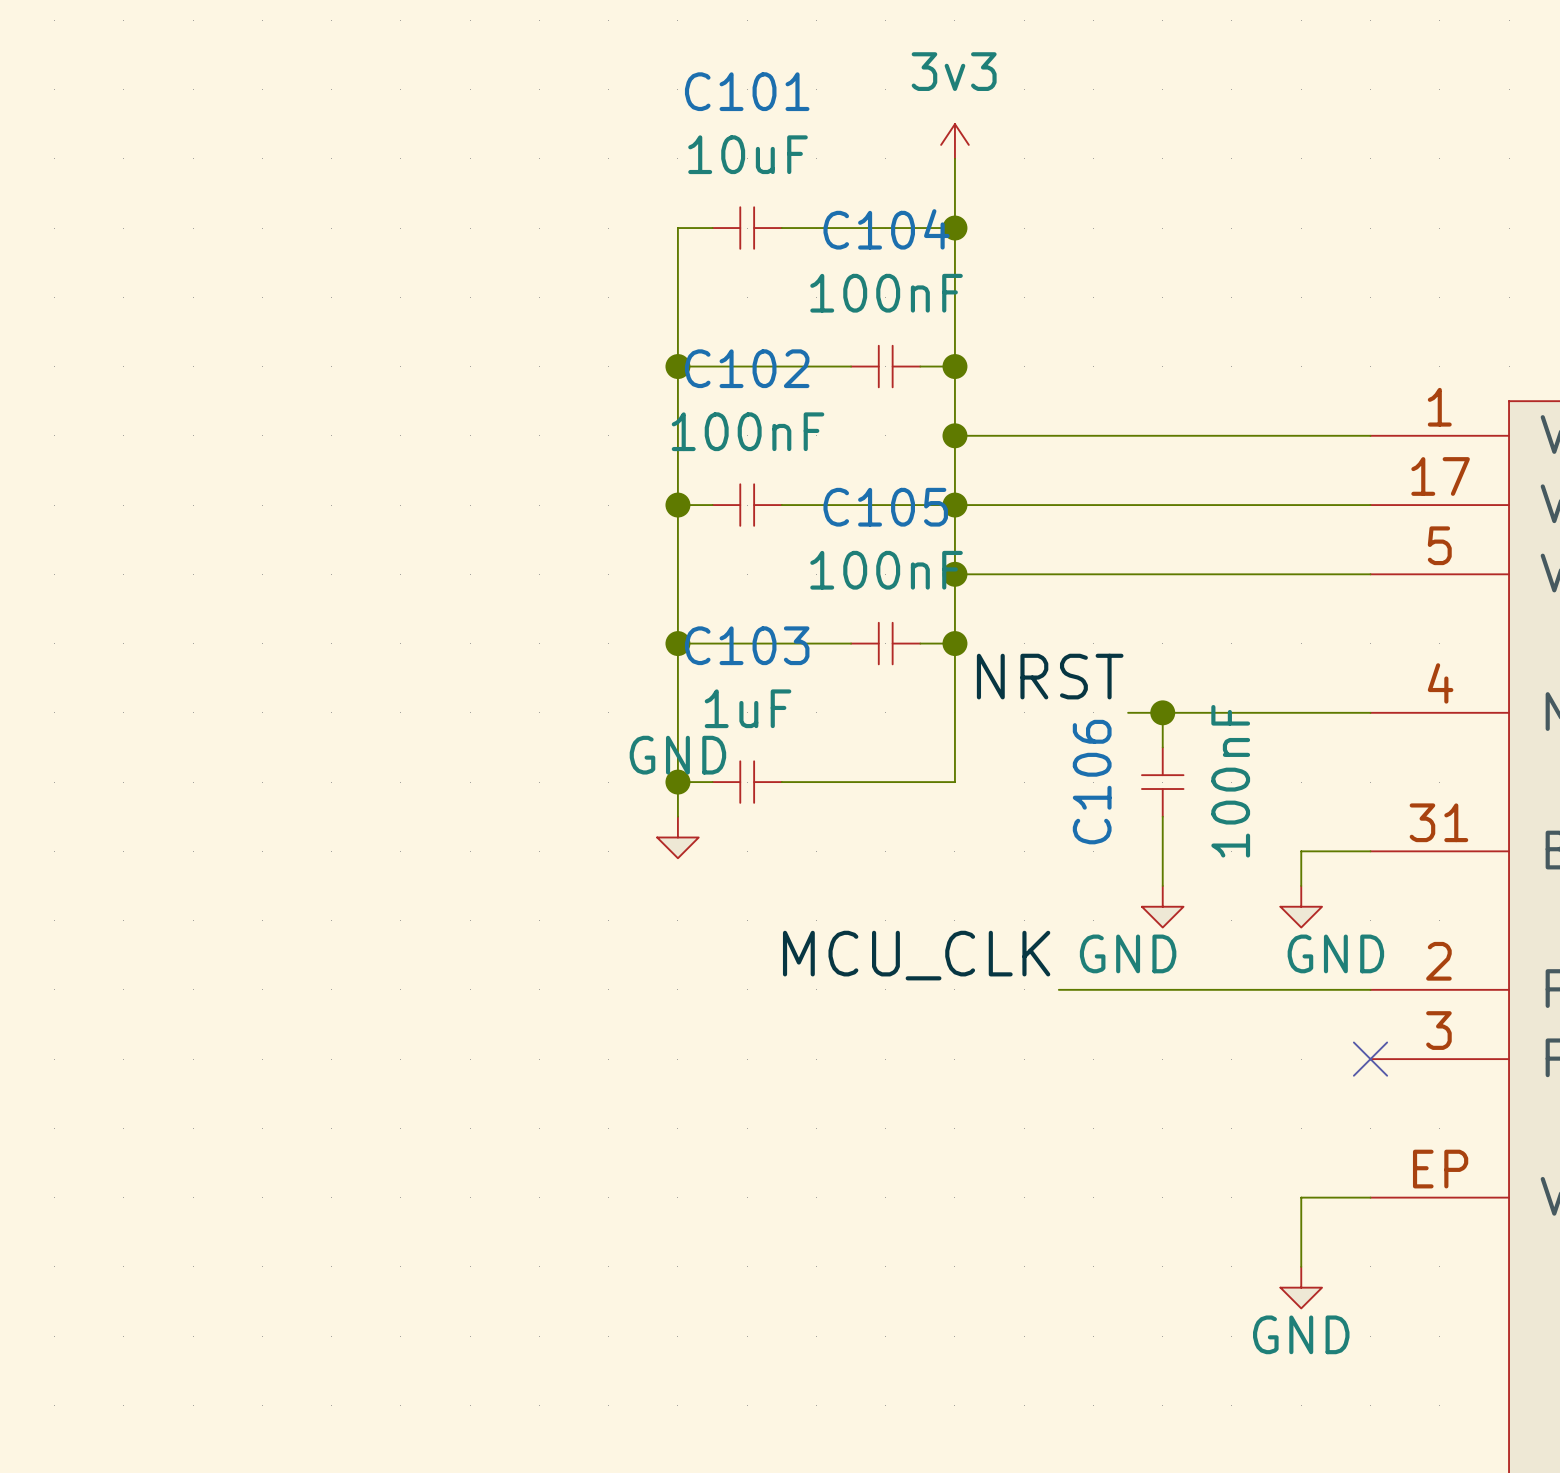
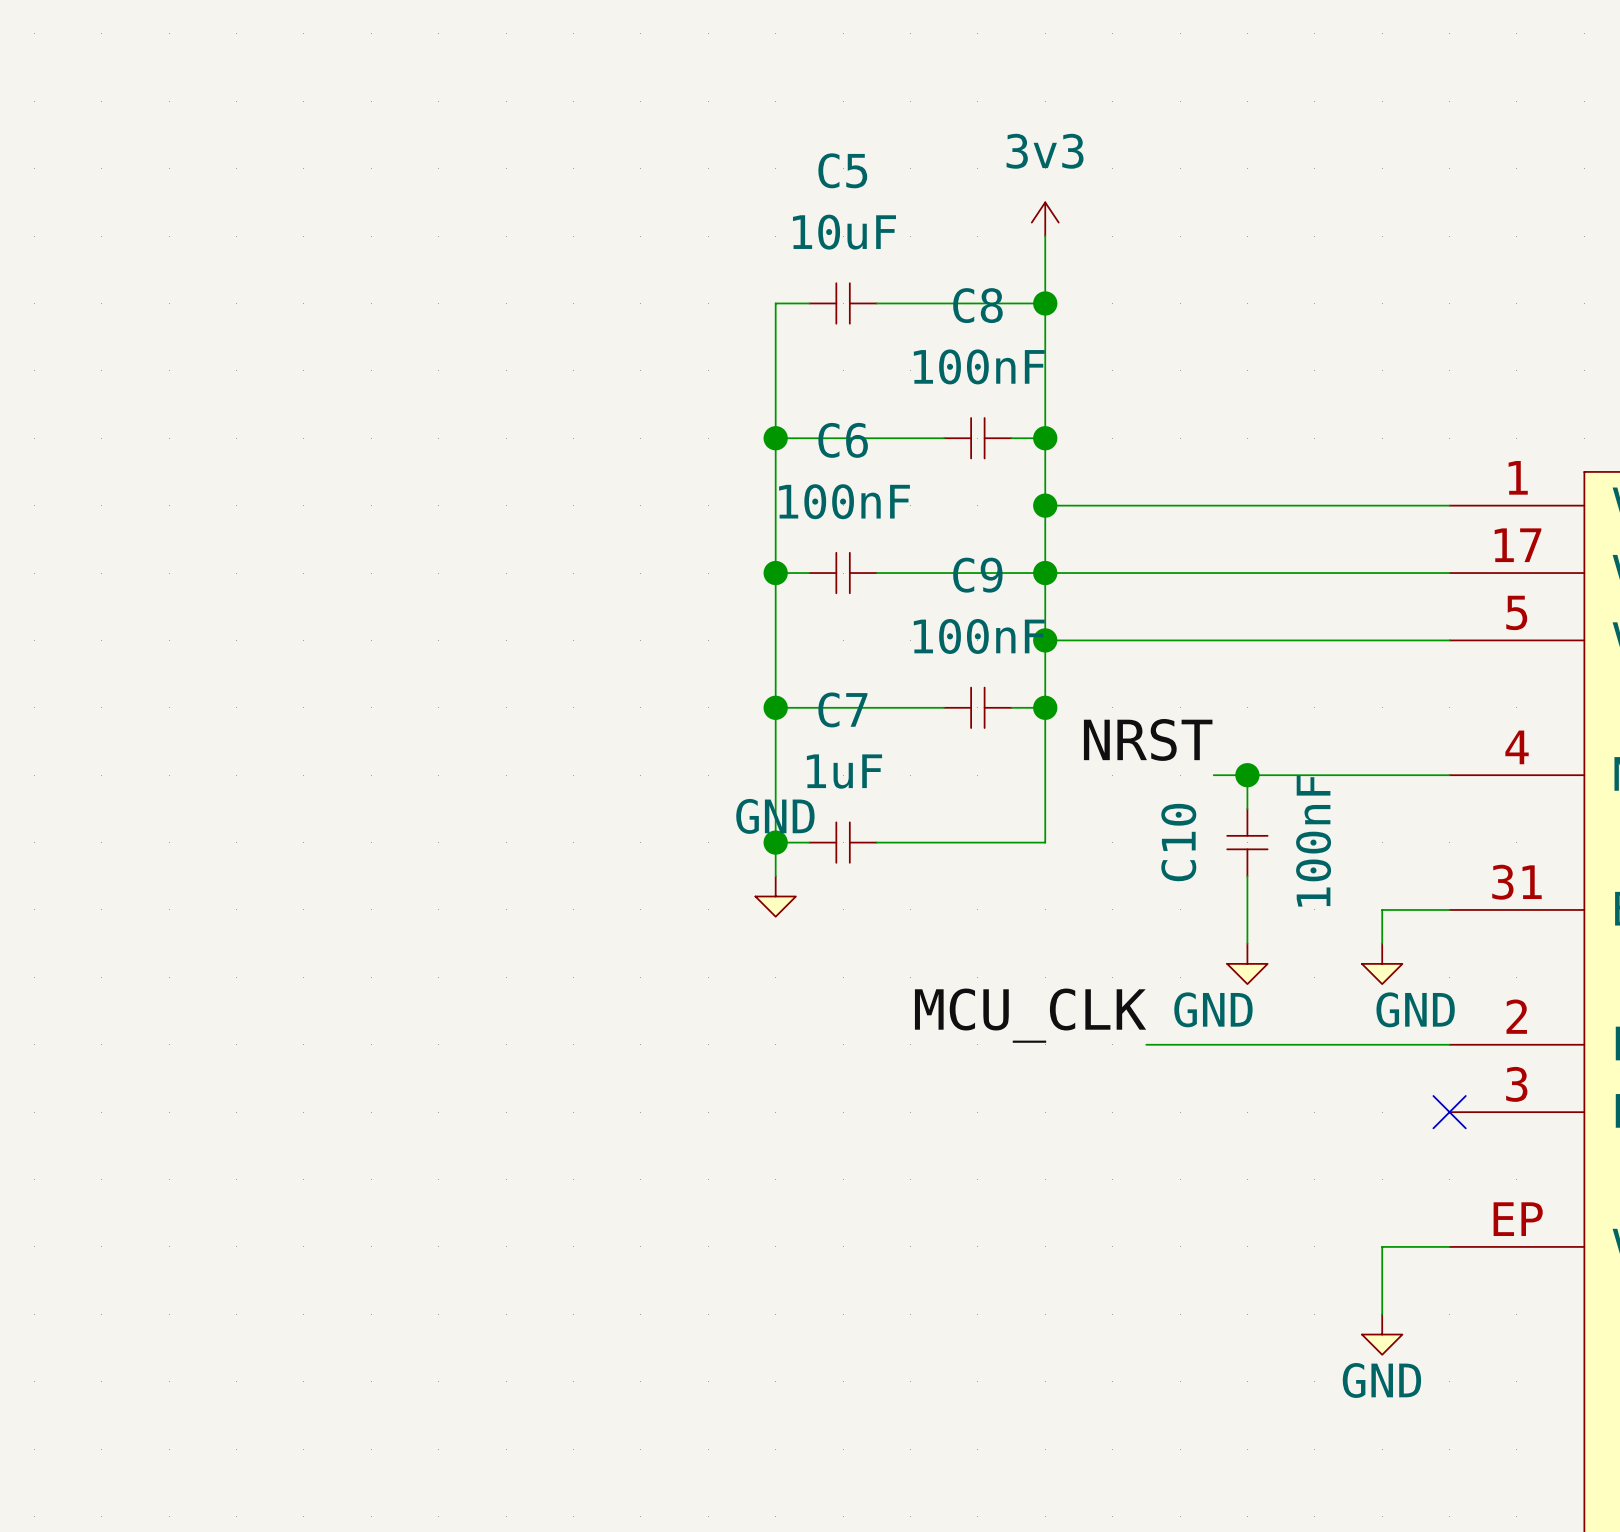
C101 name: C101 (747, 91) -> C5 (842, 170)
C104 name: C104 (886, 229) -> C8 (977, 305)
C102 name: C102 (747, 368) -> C6 (843, 440)
C105 name: C105 (885, 507) -> C9 (977, 575)
C103 name: C103 (747, 645) -> C7 (842, 709)
C106 name: C106 (1092, 782) -> C10 (1178, 842)

